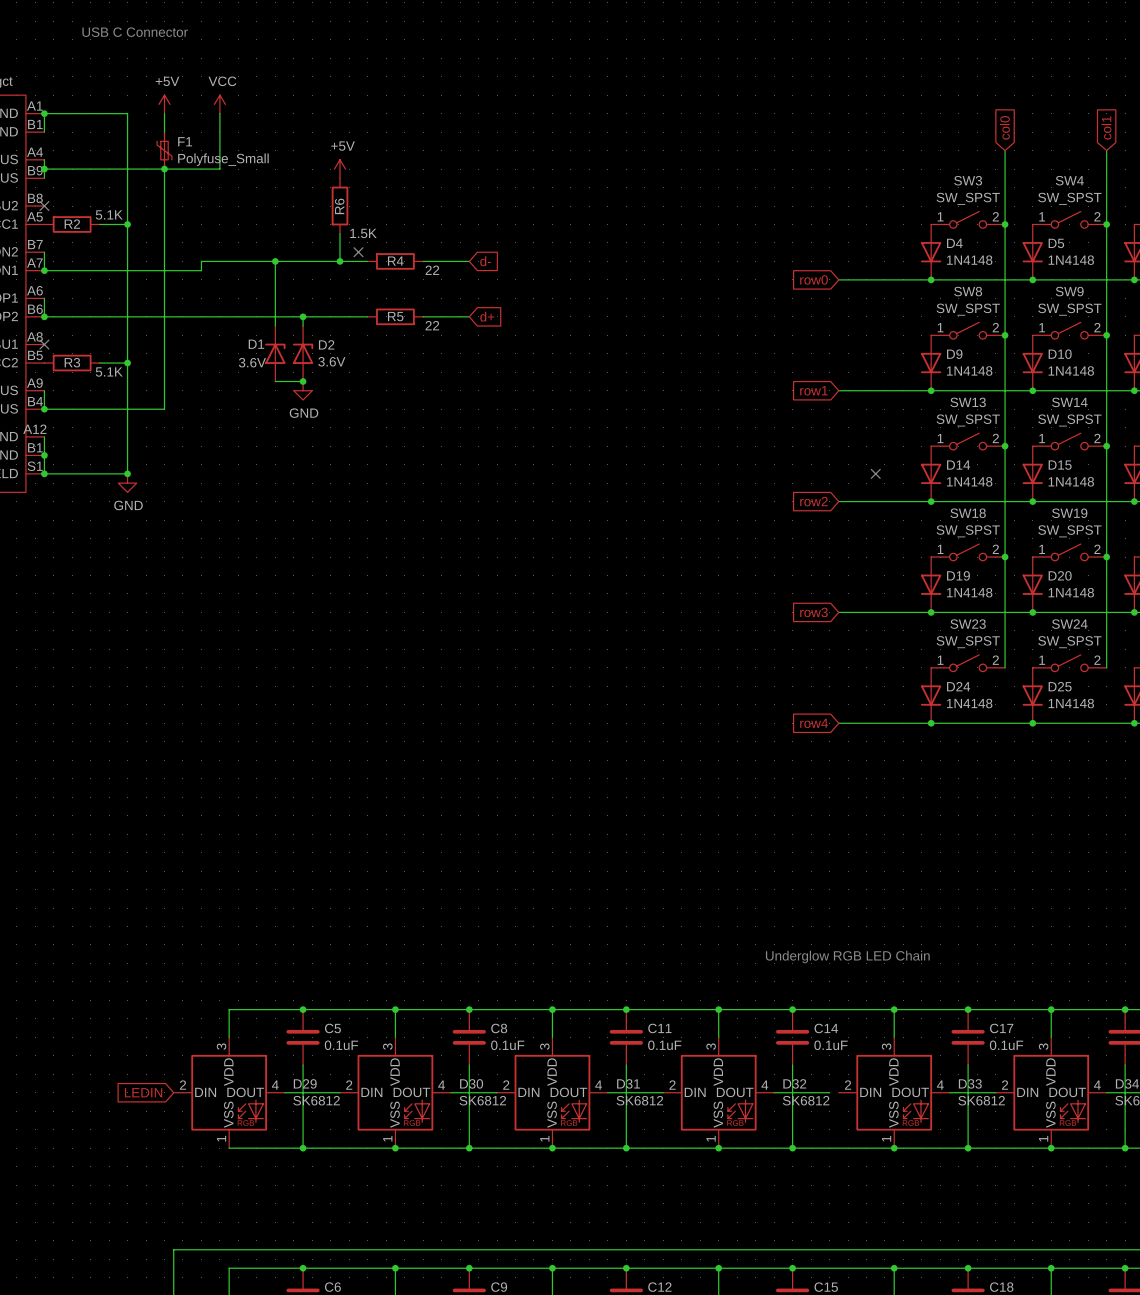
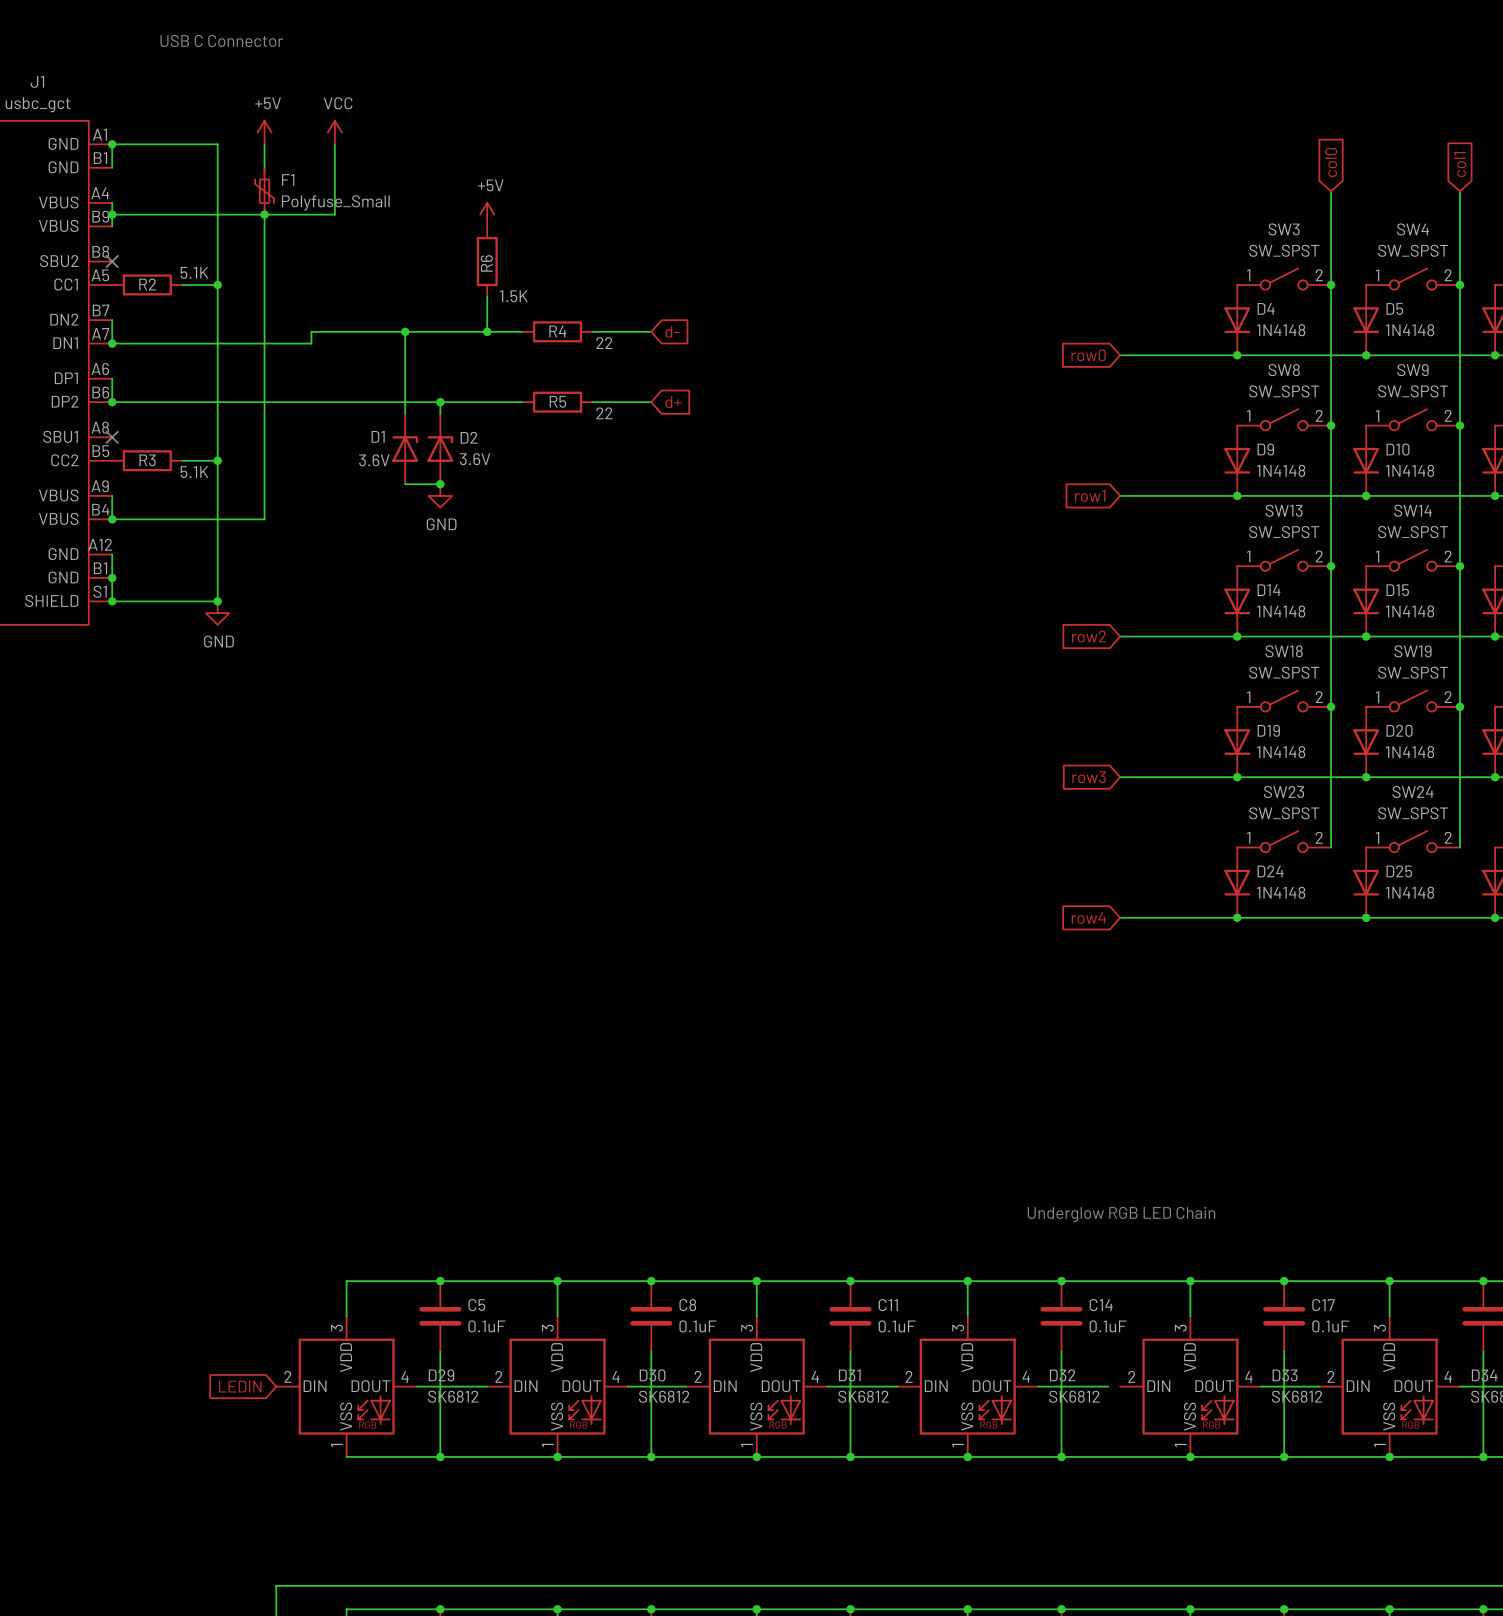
no-connect mark: (358, 252) -> none
no-connect mark: (875, 473) -> none

